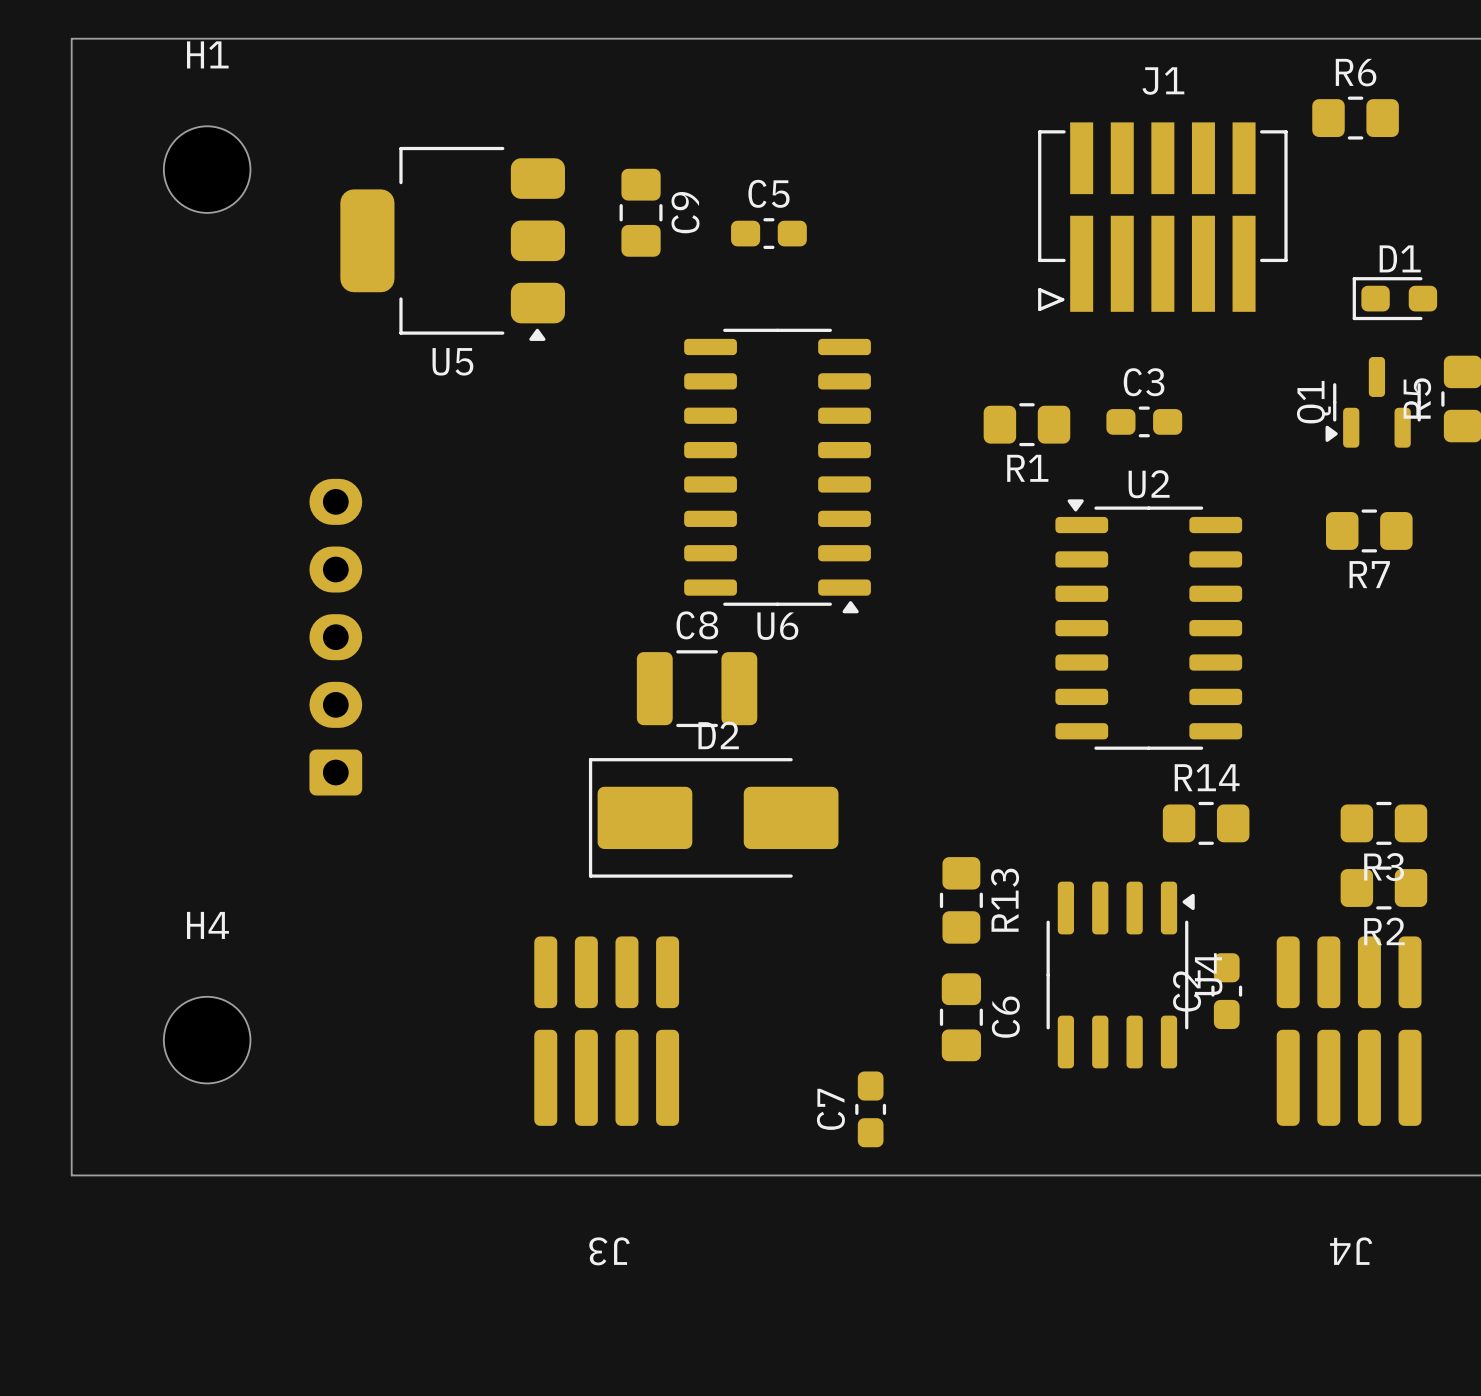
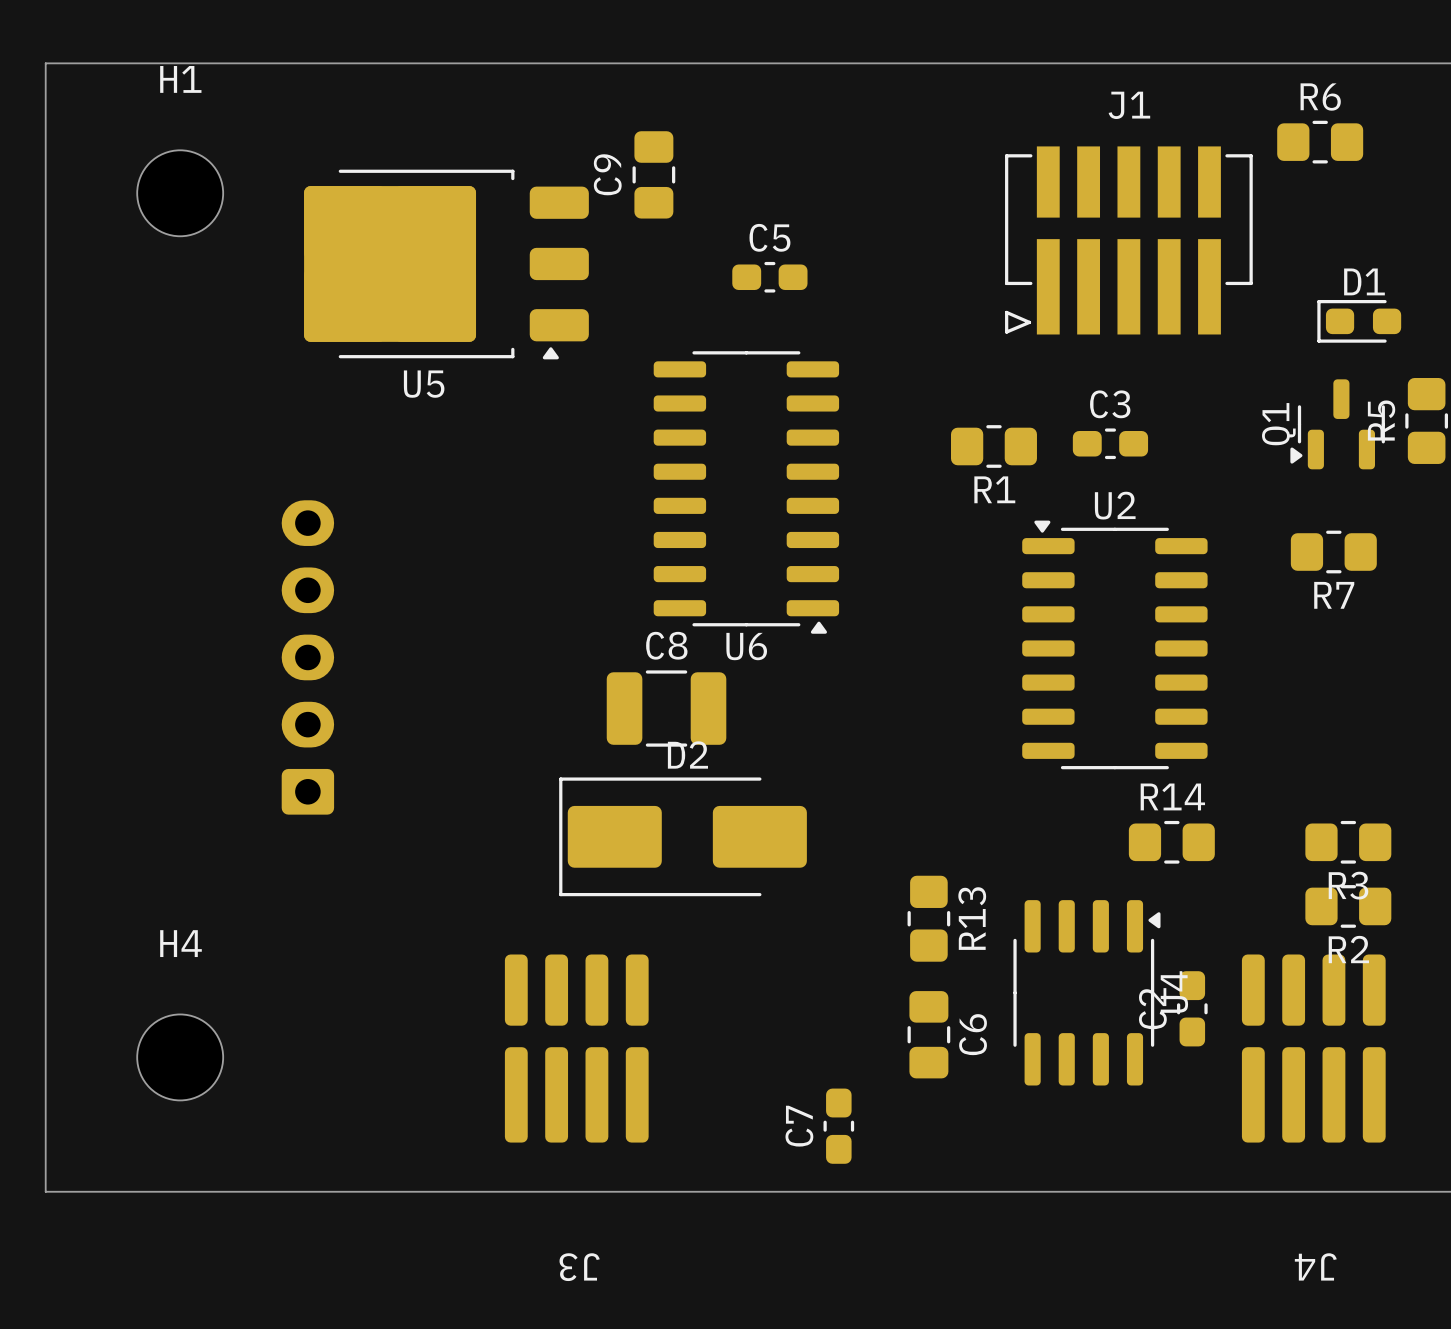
U5 footprint: [340, 146, 565, 341] -> [304, 169, 589, 360]
C9 position: (641, 212) -> (653, 174)
C9 name position: C9 (685, 212) -> C9 (607, 174)
C5 position: (768, 233) -> (769, 277)

